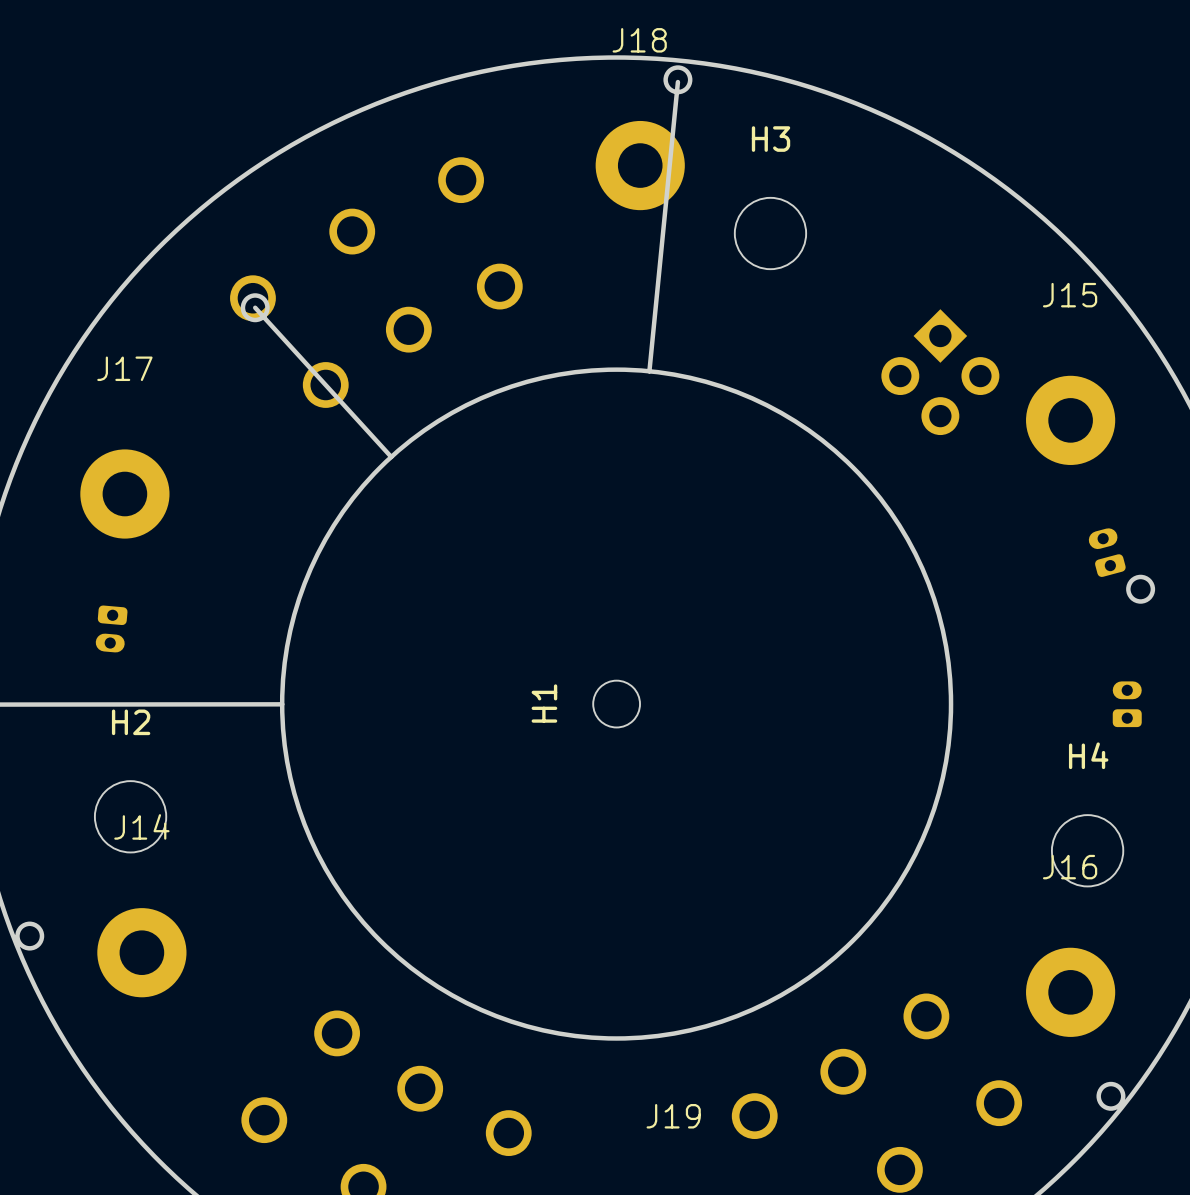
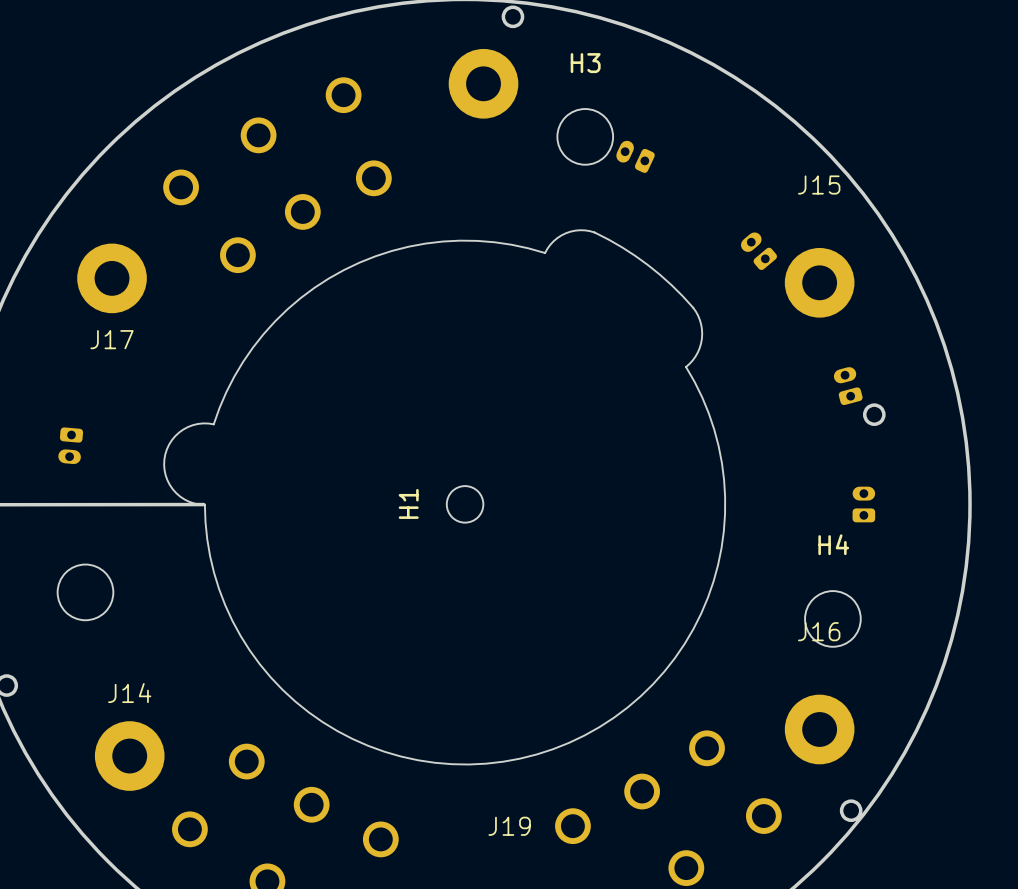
board edge: (677, 82) (649, 371) -> none
part: none -> (635, 156)
round board edge: [240, 293, 270, 323] -> none
board edge: (255, 307) (391, 456) -> none
board edge: none -> (594, 232) (635, 255) (660, 274) (693, 307) (699, 320) (702, 334) (699, 348) (692, 360) (686, 366) (702, 397) (714, 429) (721, 462) (725, 497) (723, 531) (718, 565) (701, 613) (675, 657) (640, 696) (599, 727) (553, 749) (503, 761) (451, 764) (401, 756) (352, 739) (322, 722) (295, 701) (270, 677) (240, 635) (225, 605) (214, 572) (207, 539) (204, 504) (184, 499) (172, 489) (167, 480) (164, 464) (169, 444) (179, 432) (187, 427) (198, 423) (213, 424) (234, 376) (263, 334) (300, 298) (343, 270) (391, 250) (425, 243) (477, 240) (511, 244) (545, 253) (553, 241) (565, 233) (580, 230) (594, 232)
round board edge: [279, 367, 954, 1041] -> none
J17 name position: J17 (124, 368) -> J17 (112, 339)
part: (940, 372) -> none
part: none -> (759, 251)
J17 position: (124, 494) -> (112, 278)
H2 name: H2 (131, 722) -> none
J14 name position: J14 (141, 826) -> J14 (129, 693)
J14 position: (141, 952) -> (129, 756)

